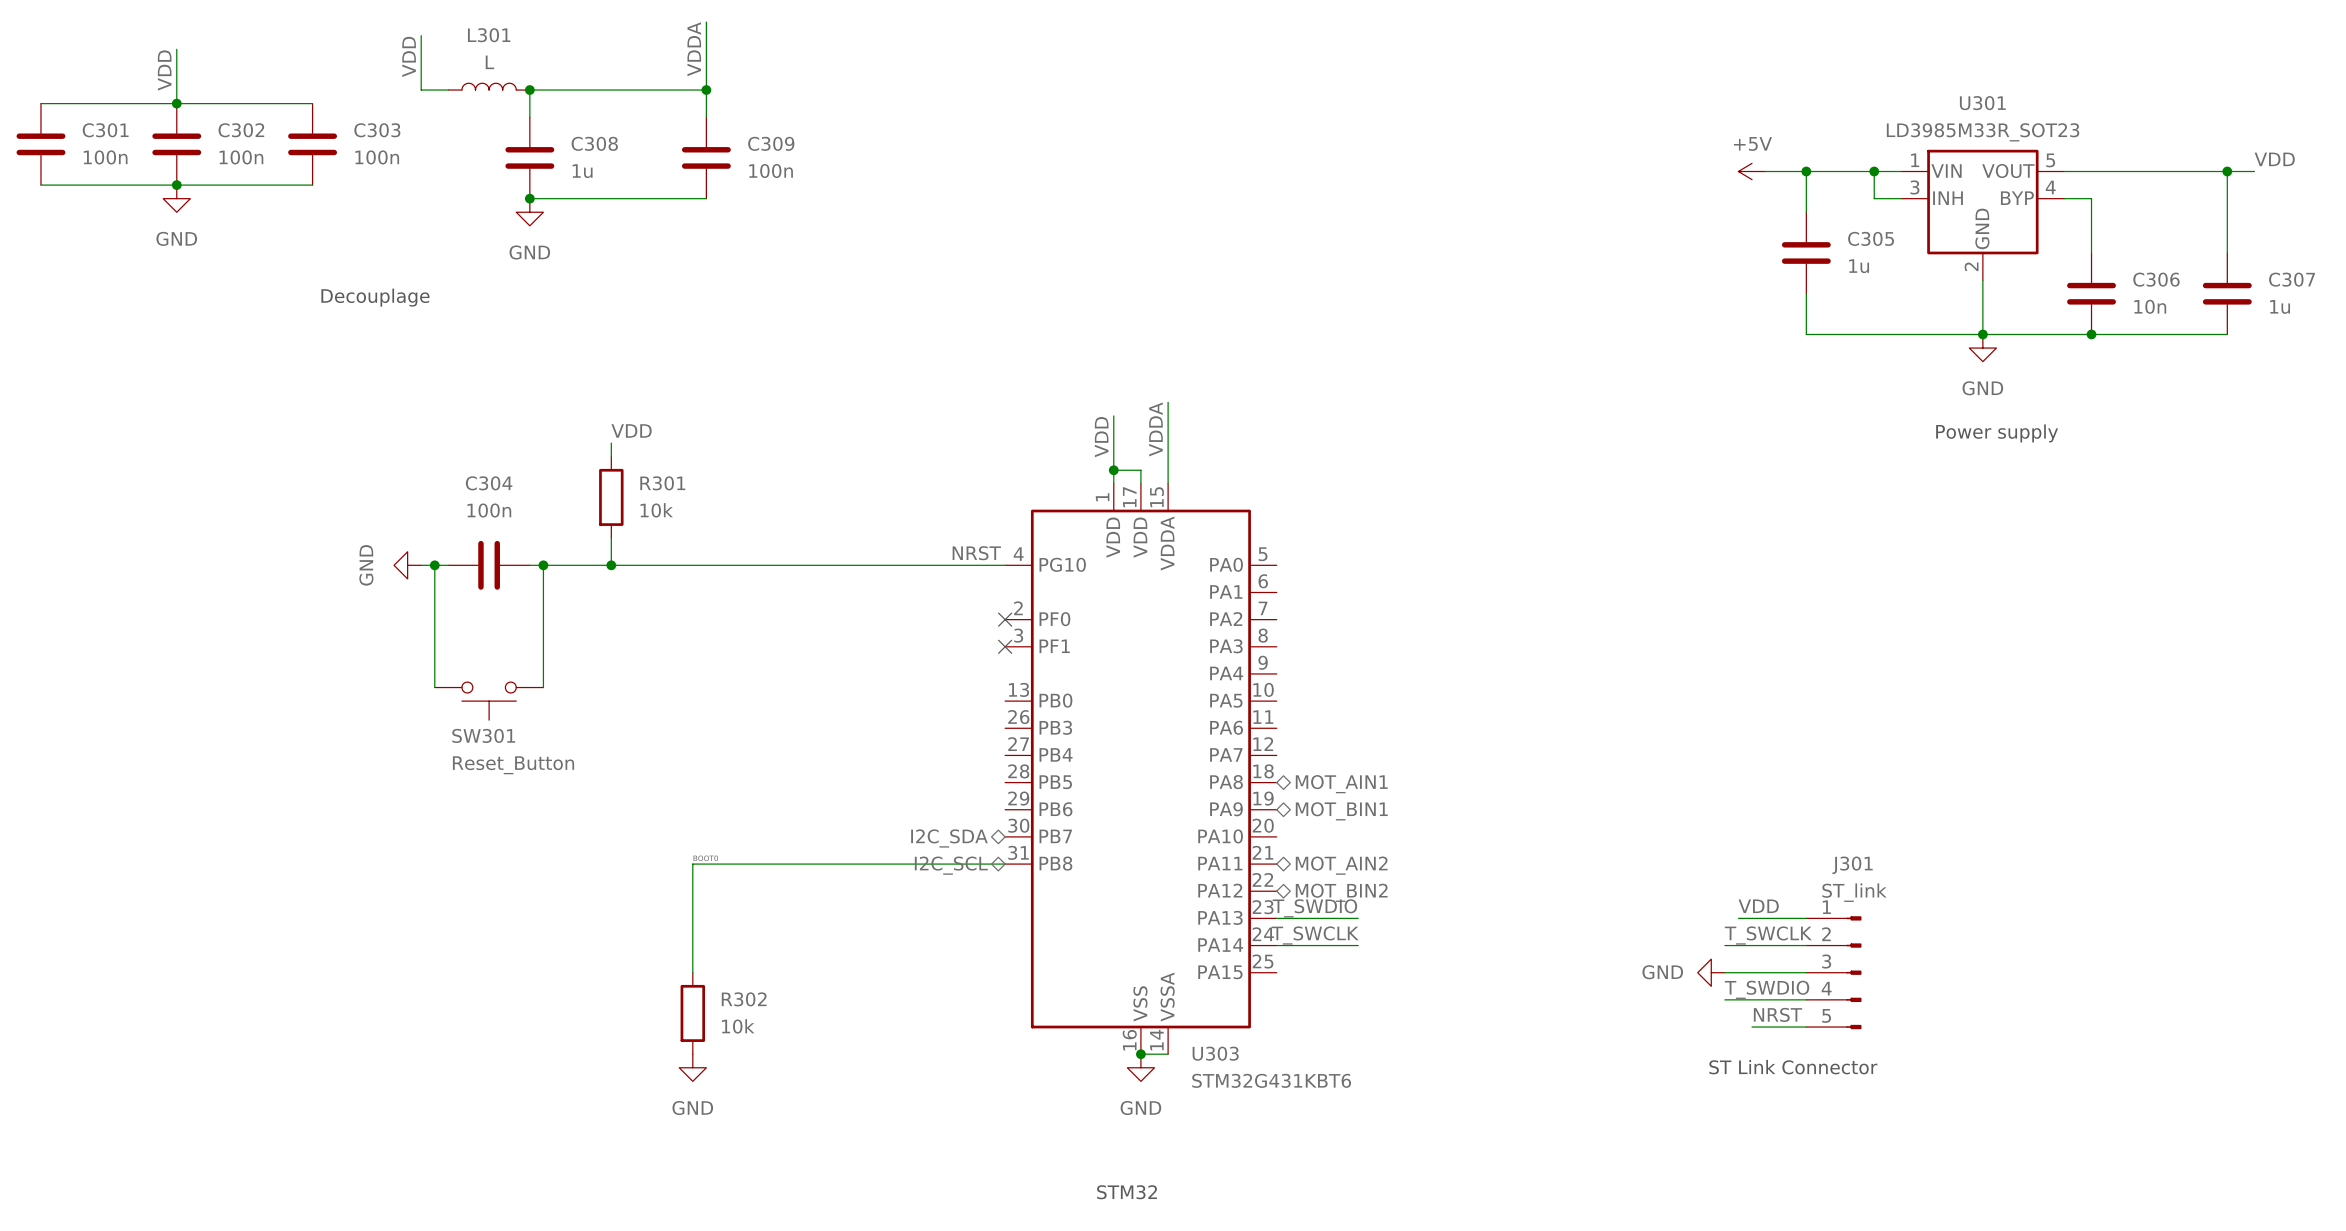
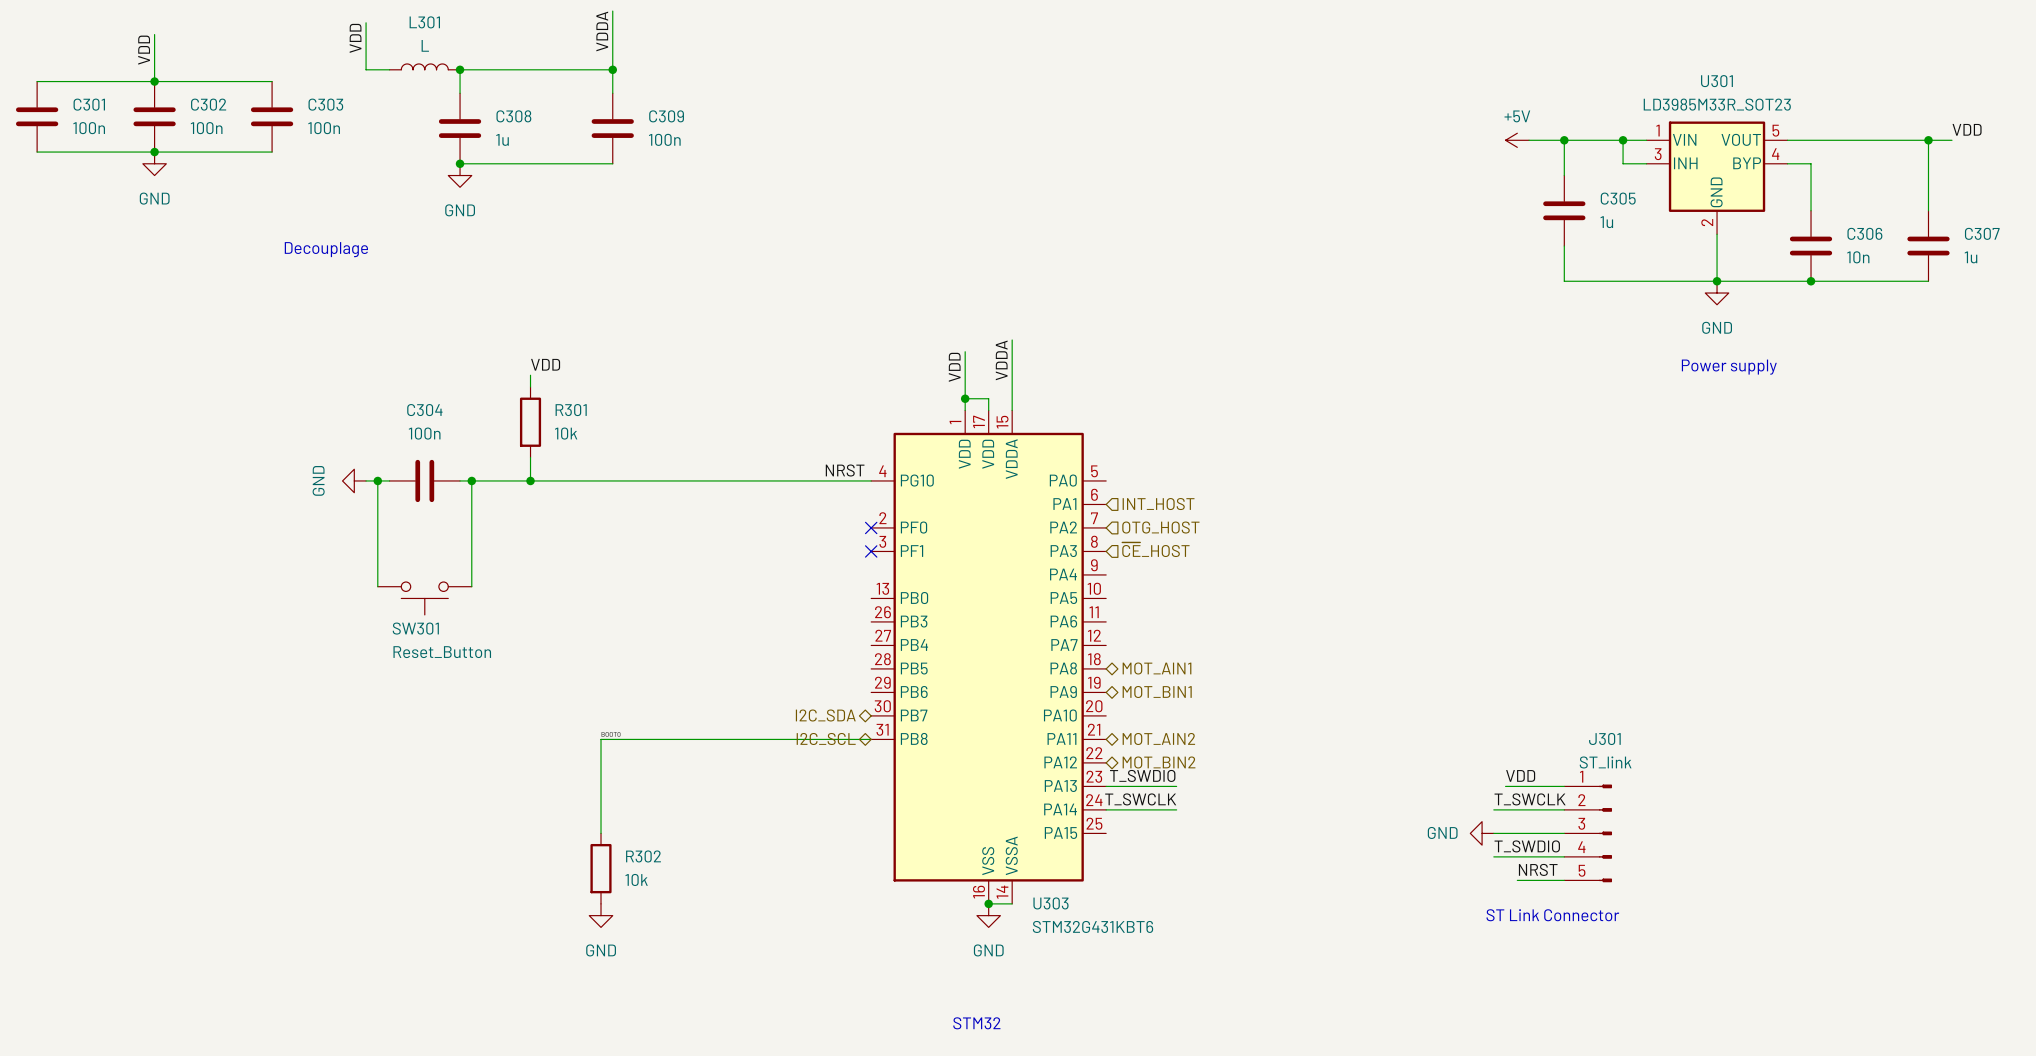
hierarchical label: none -> INT_HOST (1158, 504)
hierarchical label: none -> OTG_HOST (1160, 527)
hierarchical label: none -> ~{CE}_HOST (1155, 549)

